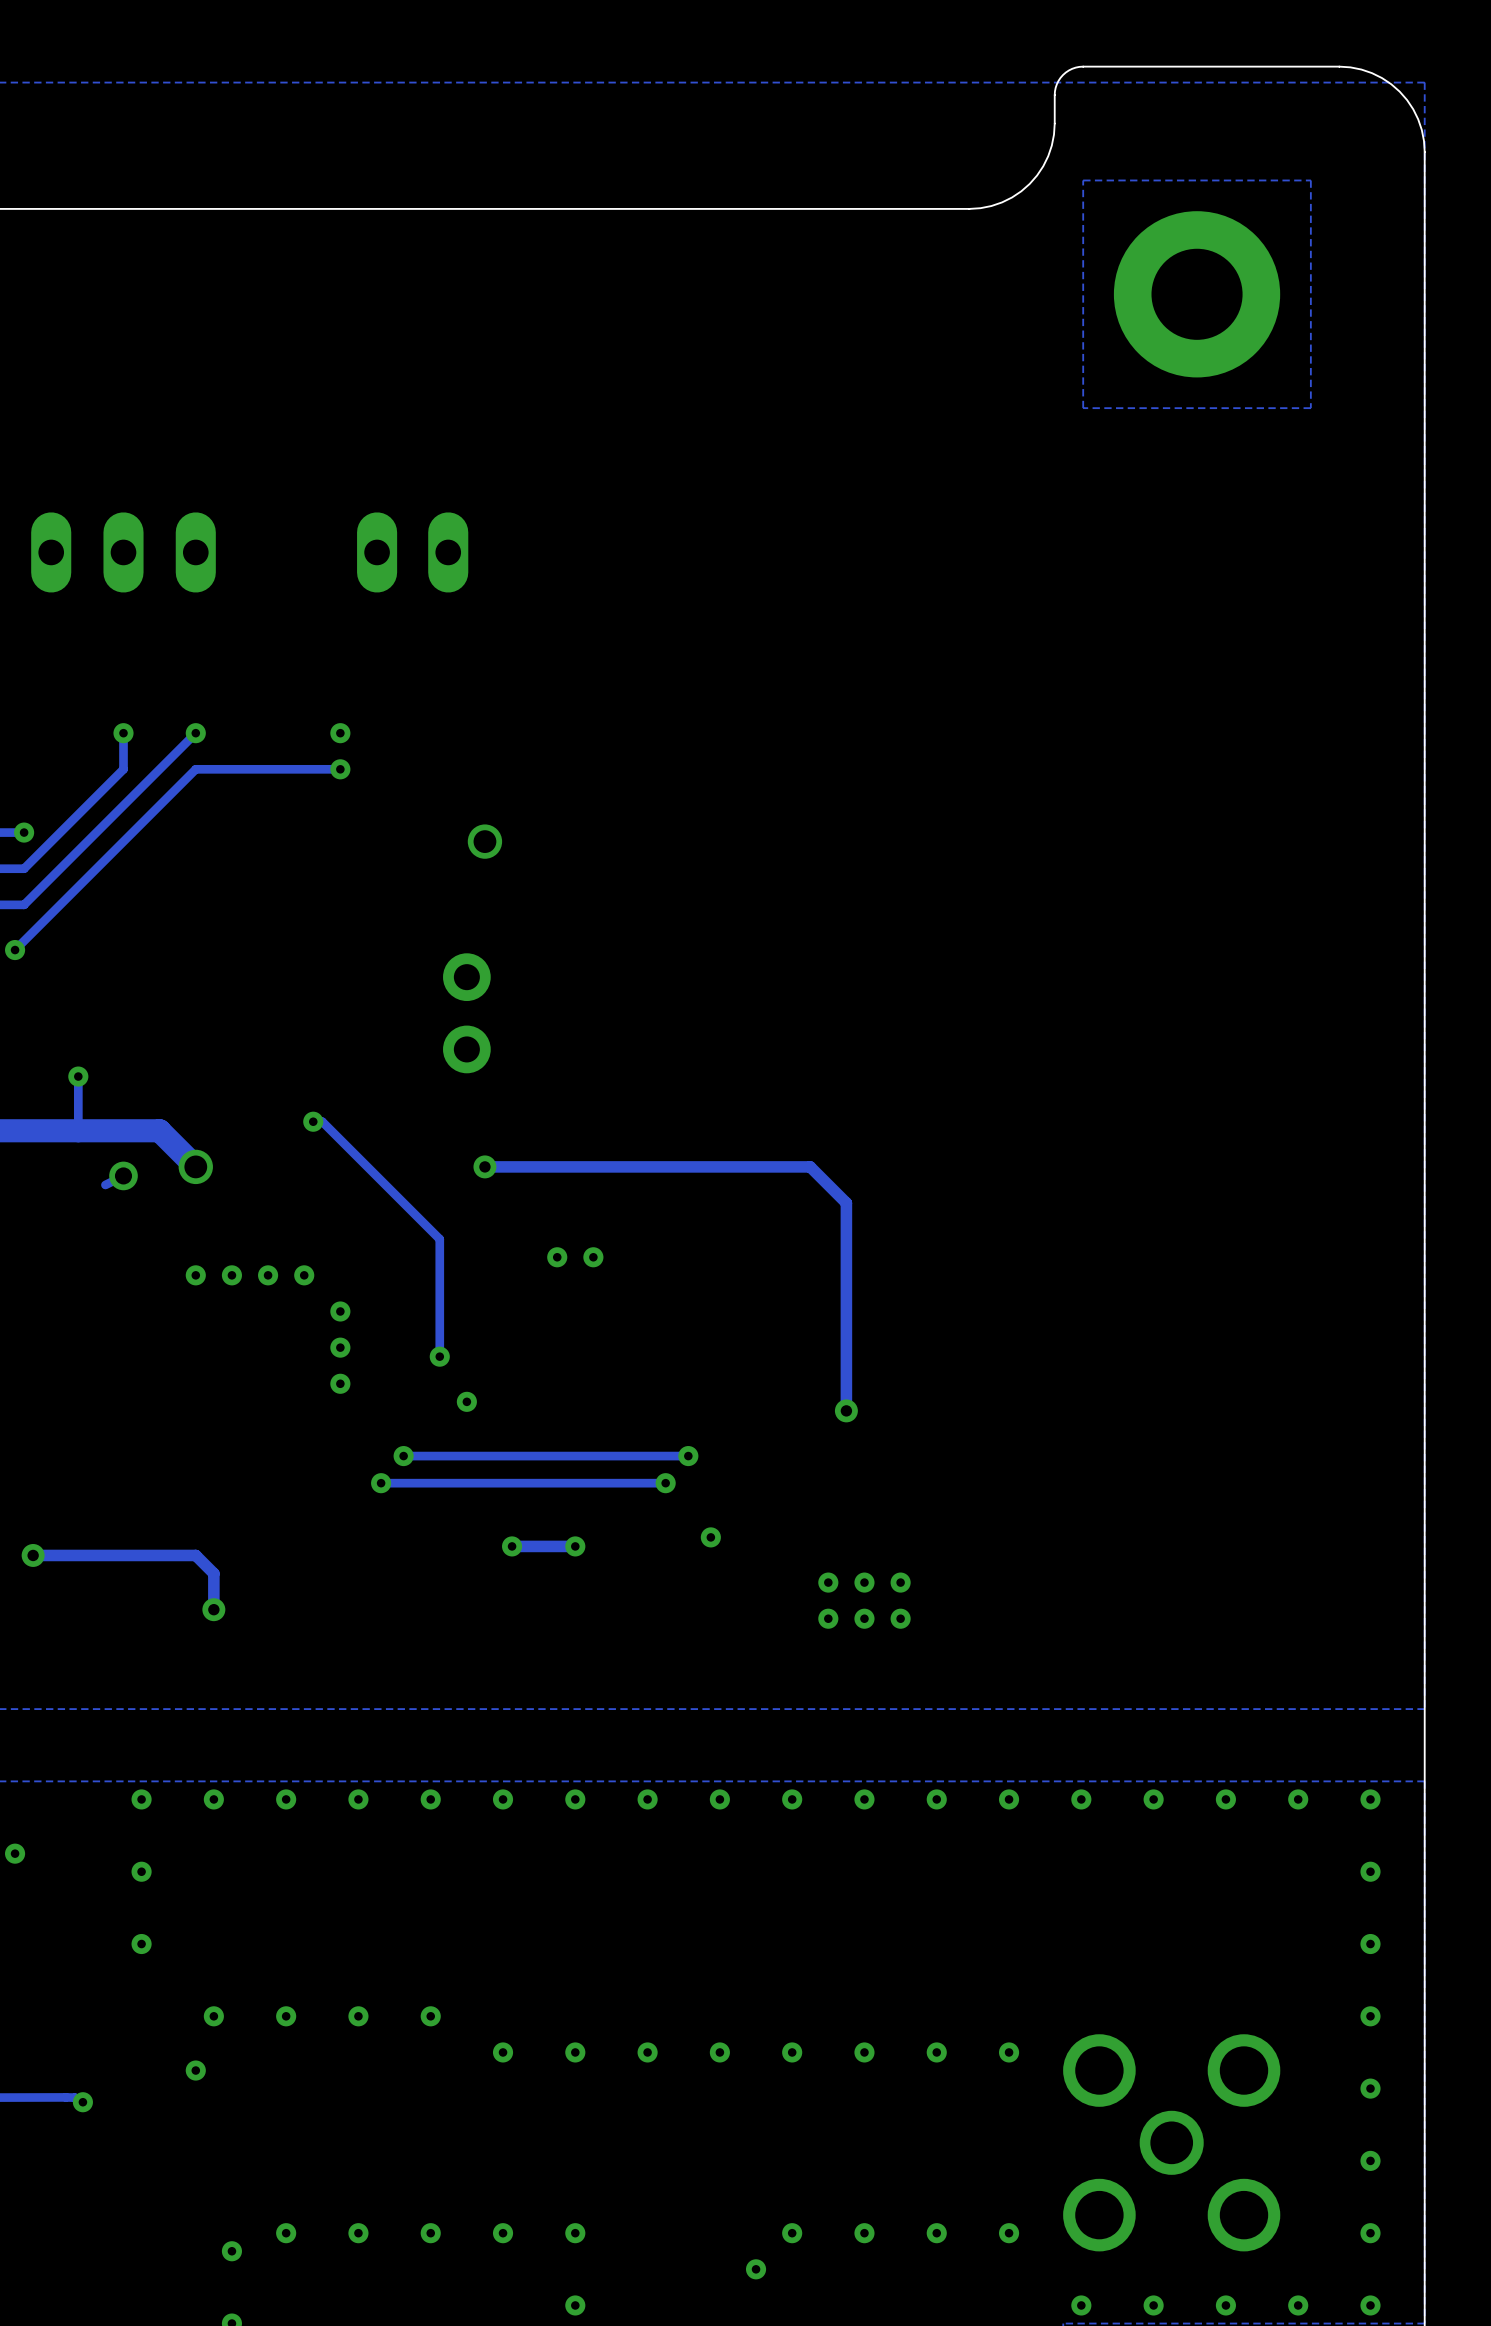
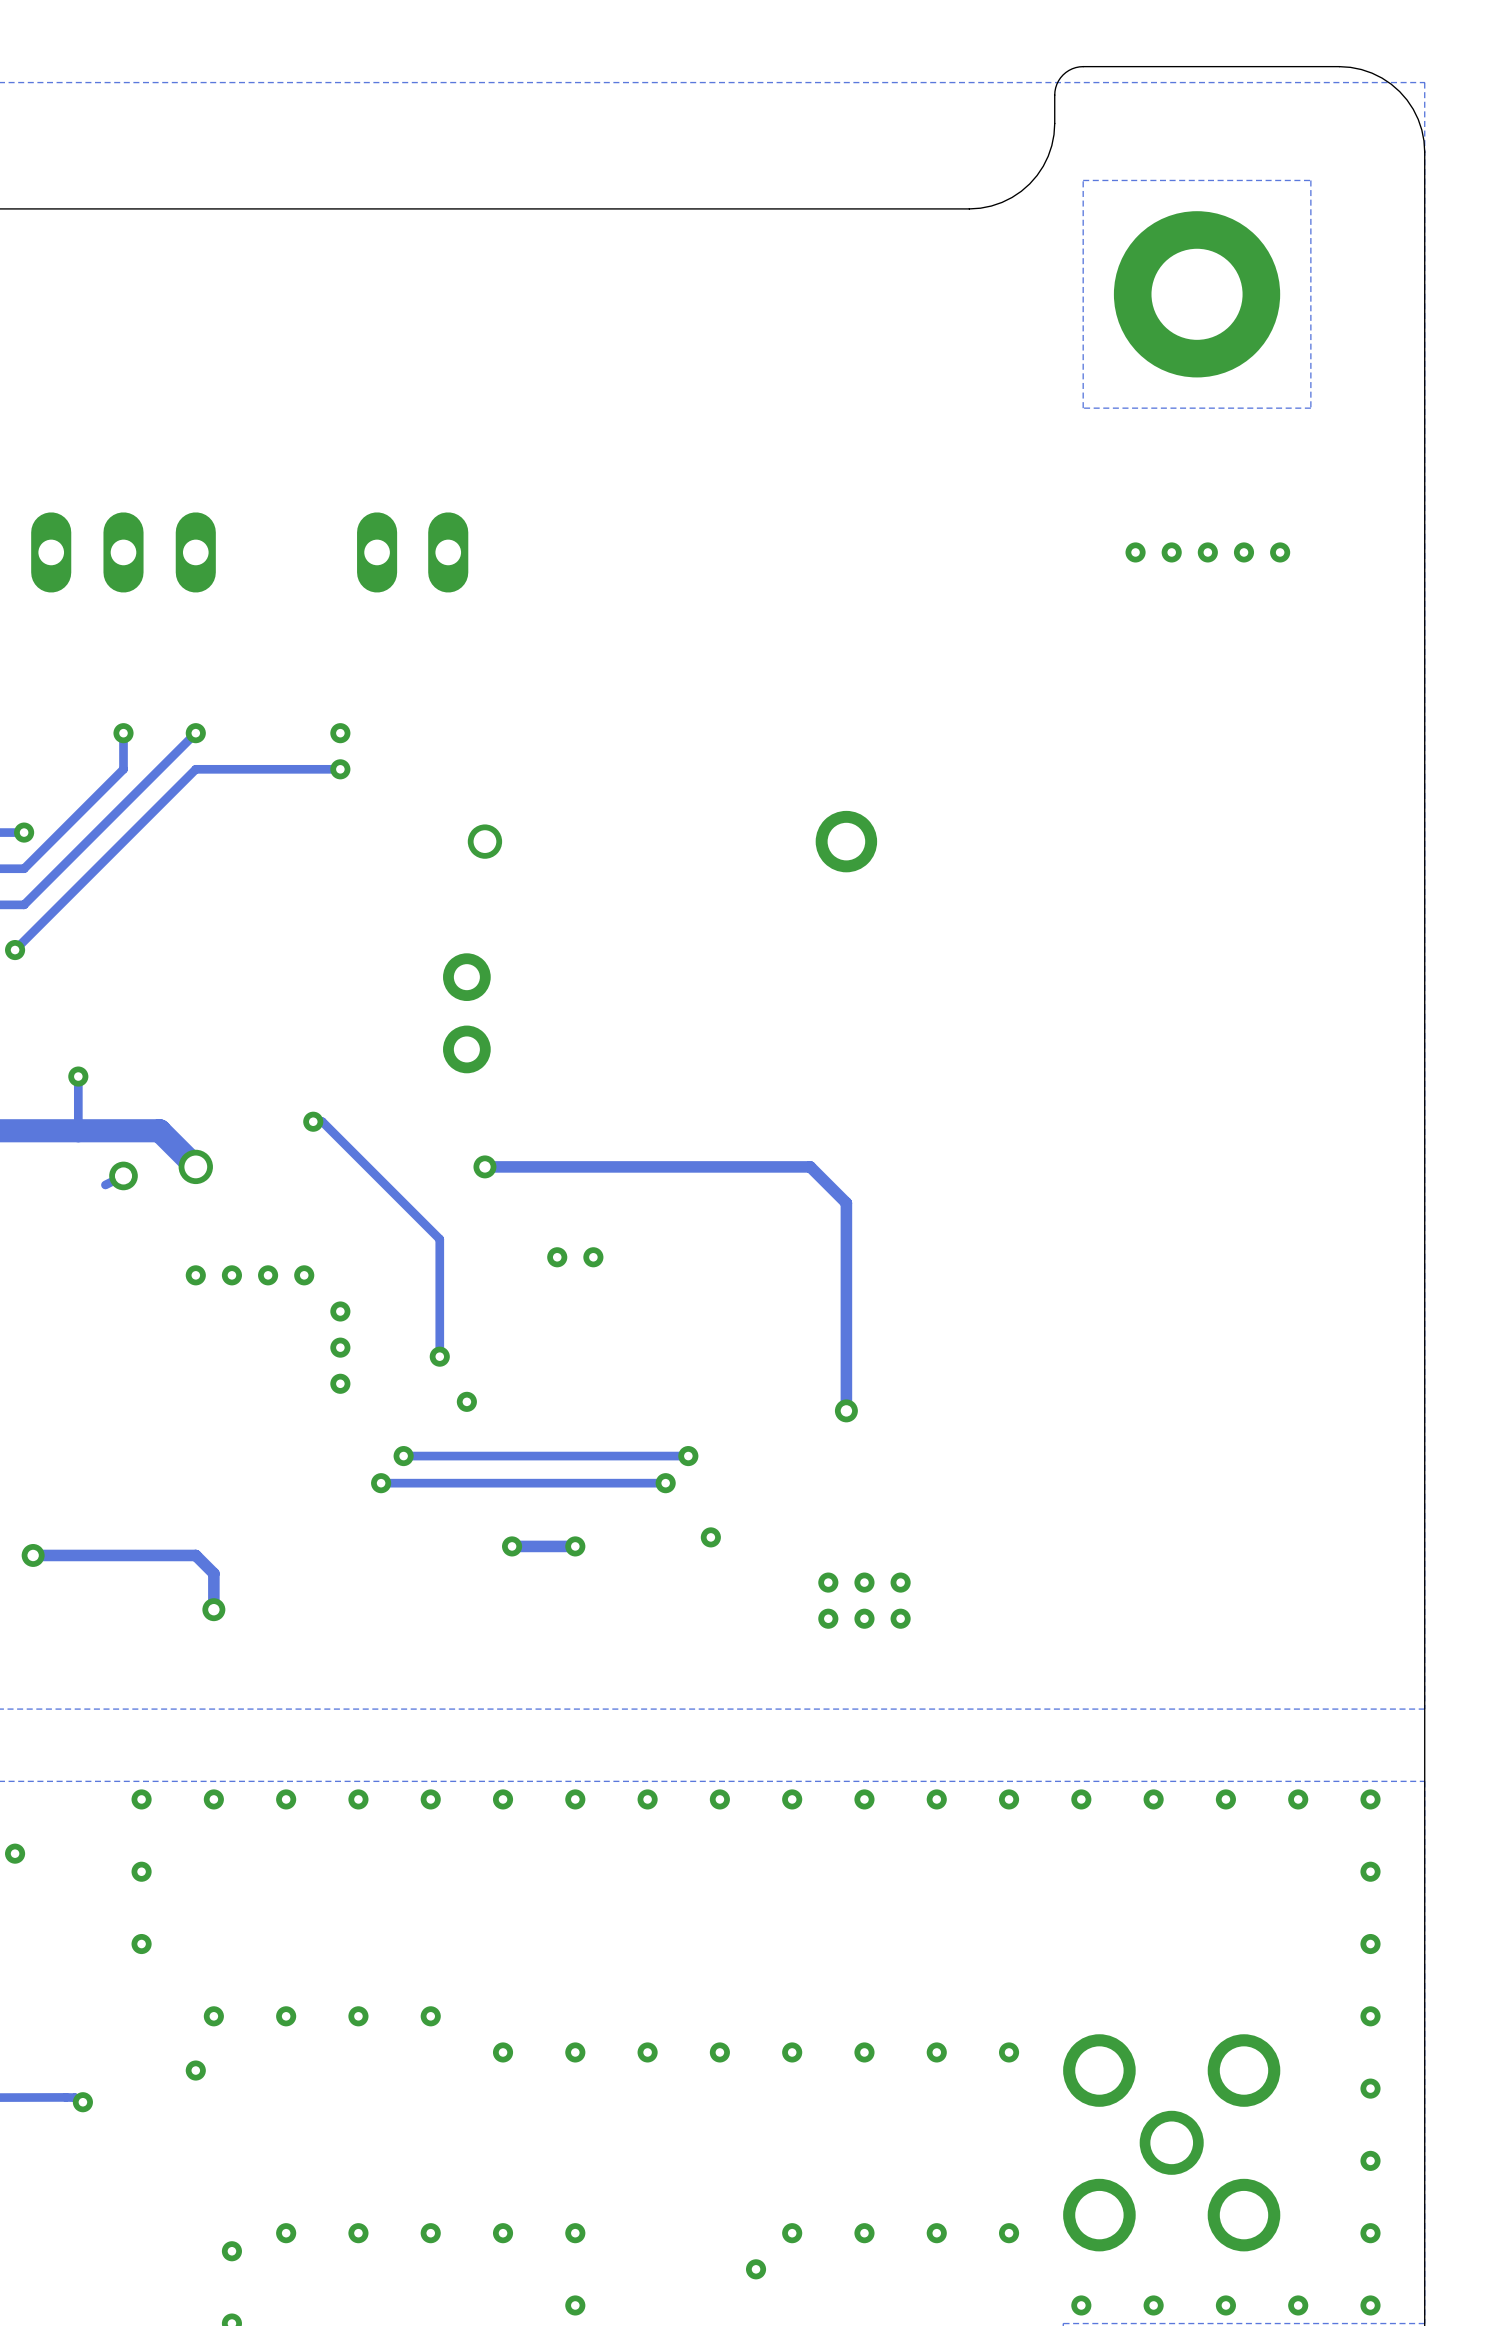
via: none -> (1135, 552)
via: none -> (1171, 552)
via: none -> (1207, 552)
via: none -> (1243, 552)
via: none -> (1280, 552)
part: none -> (846, 841)

